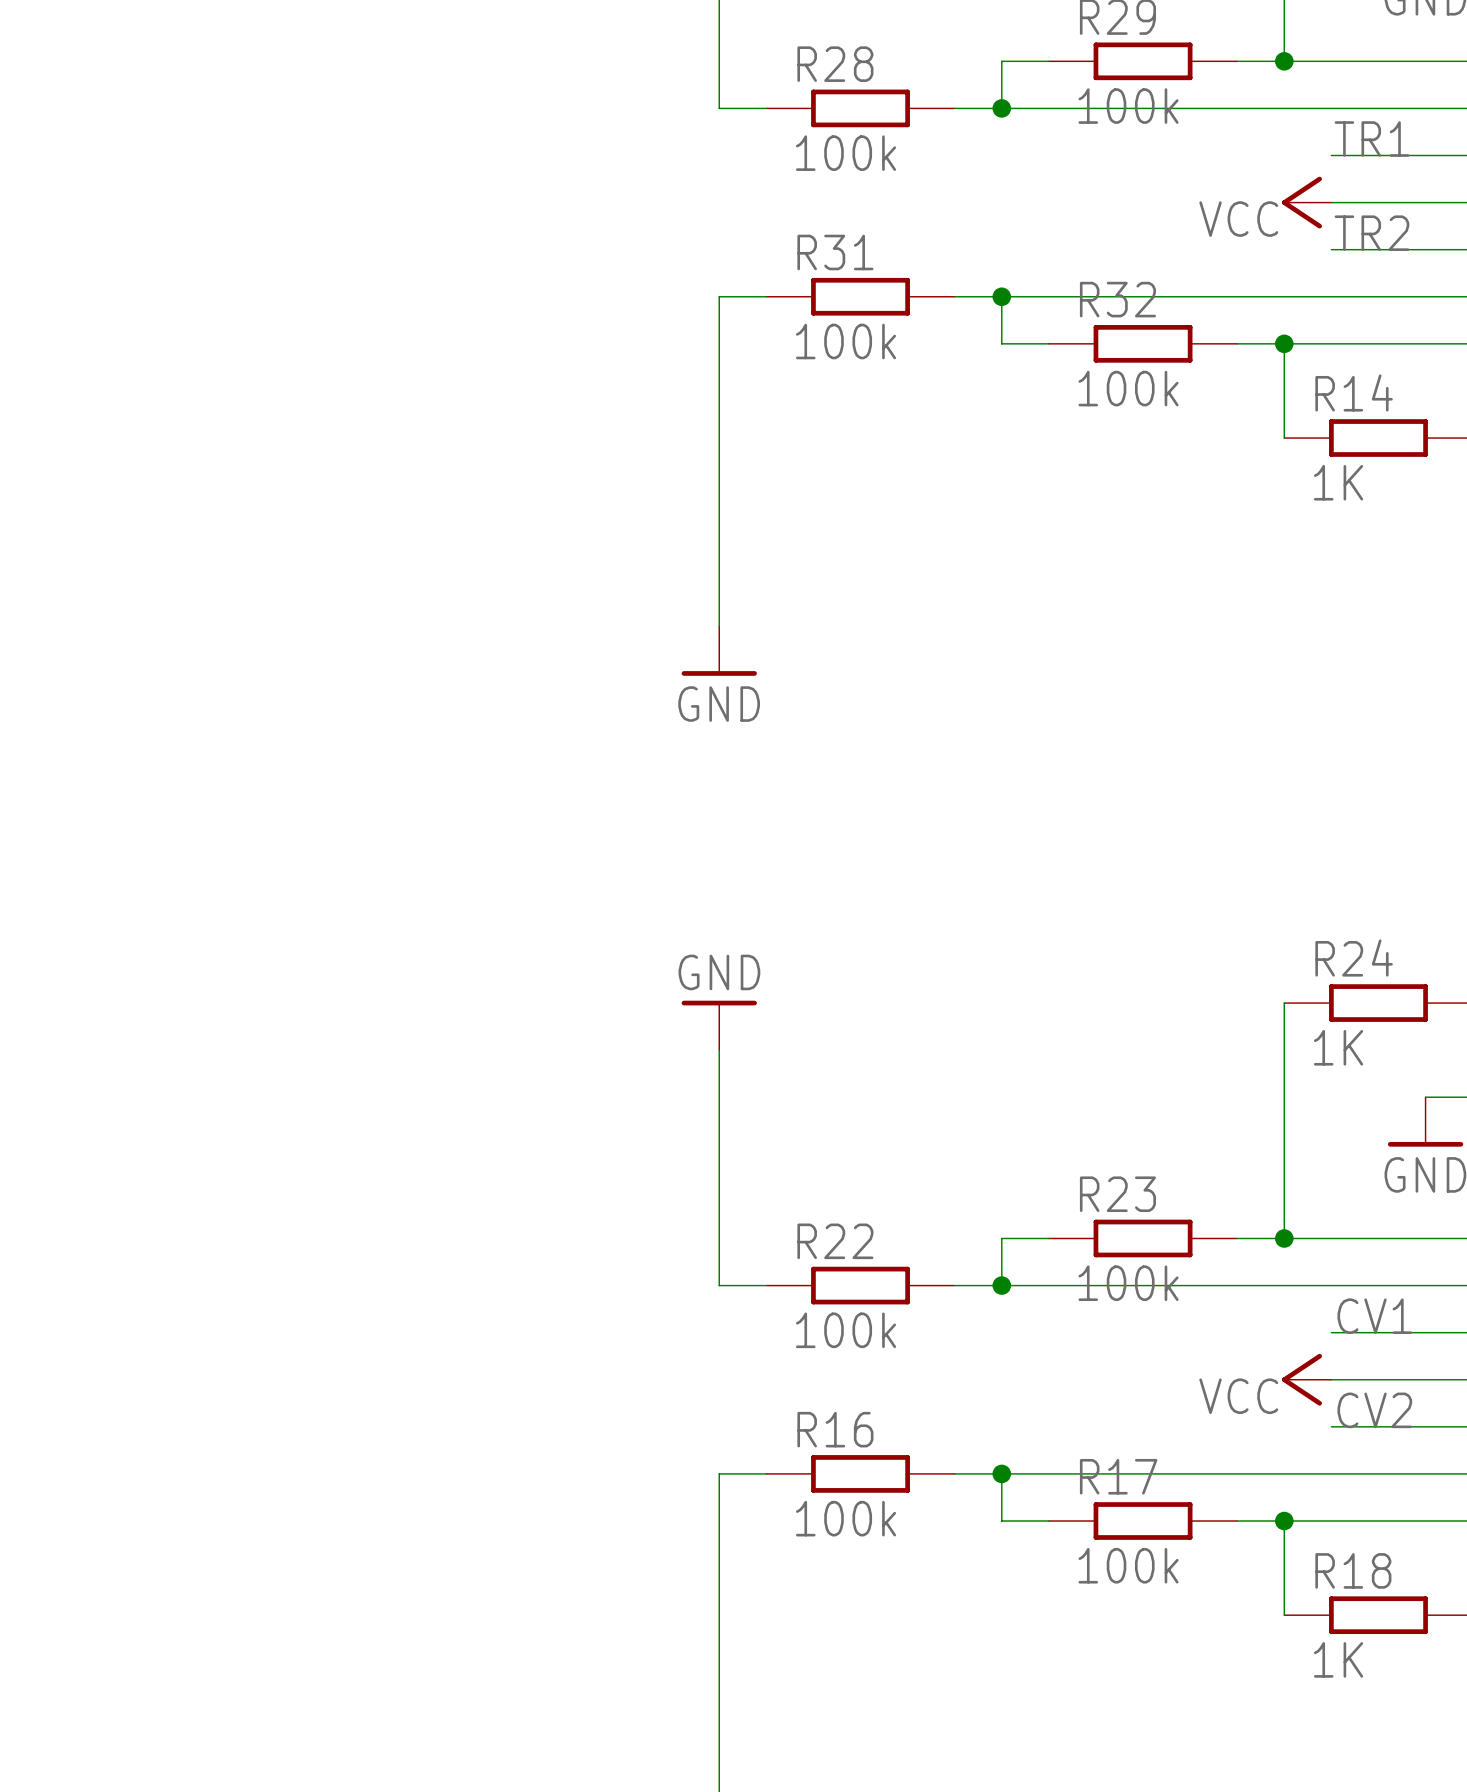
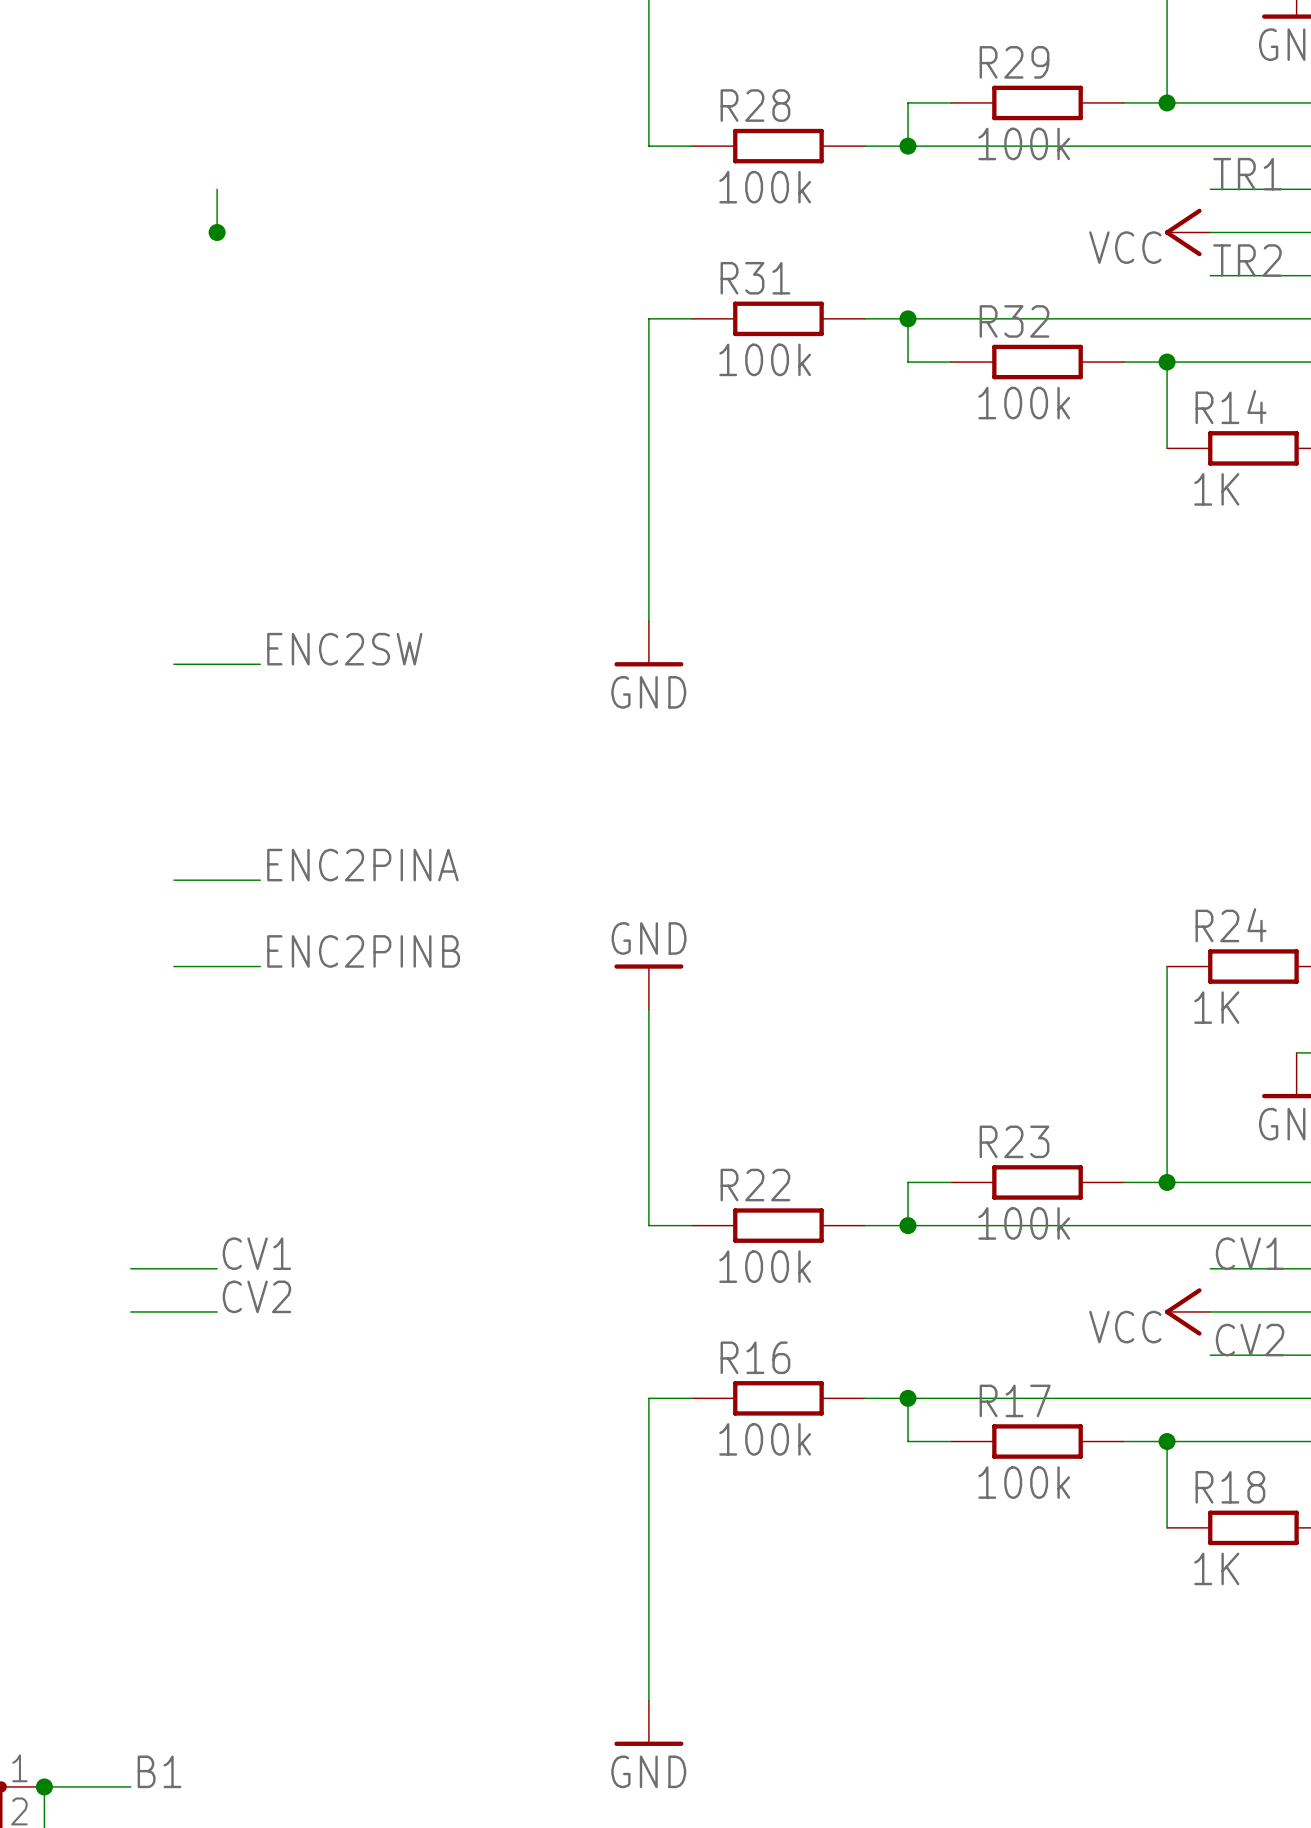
wire: none -> (217, 189) (217, 232)
junction: none -> (217, 232)
label: none -> ENC2SW (344, 649)
wire: none -> (173, 664) (260, 664)
label: none -> ENC2PINA (362, 865)
wire: none -> (173, 880) (260, 880)
label: none -> ENC2PINB (363, 951)
wire: none -> (173, 966) (260, 966)
label: none -> CV1 (256, 1253)
wire: none -> (130, 1268) (217, 1268)
label: none -> CV2 (256, 1296)
wire: none -> (130, 1311) (217, 1311)

